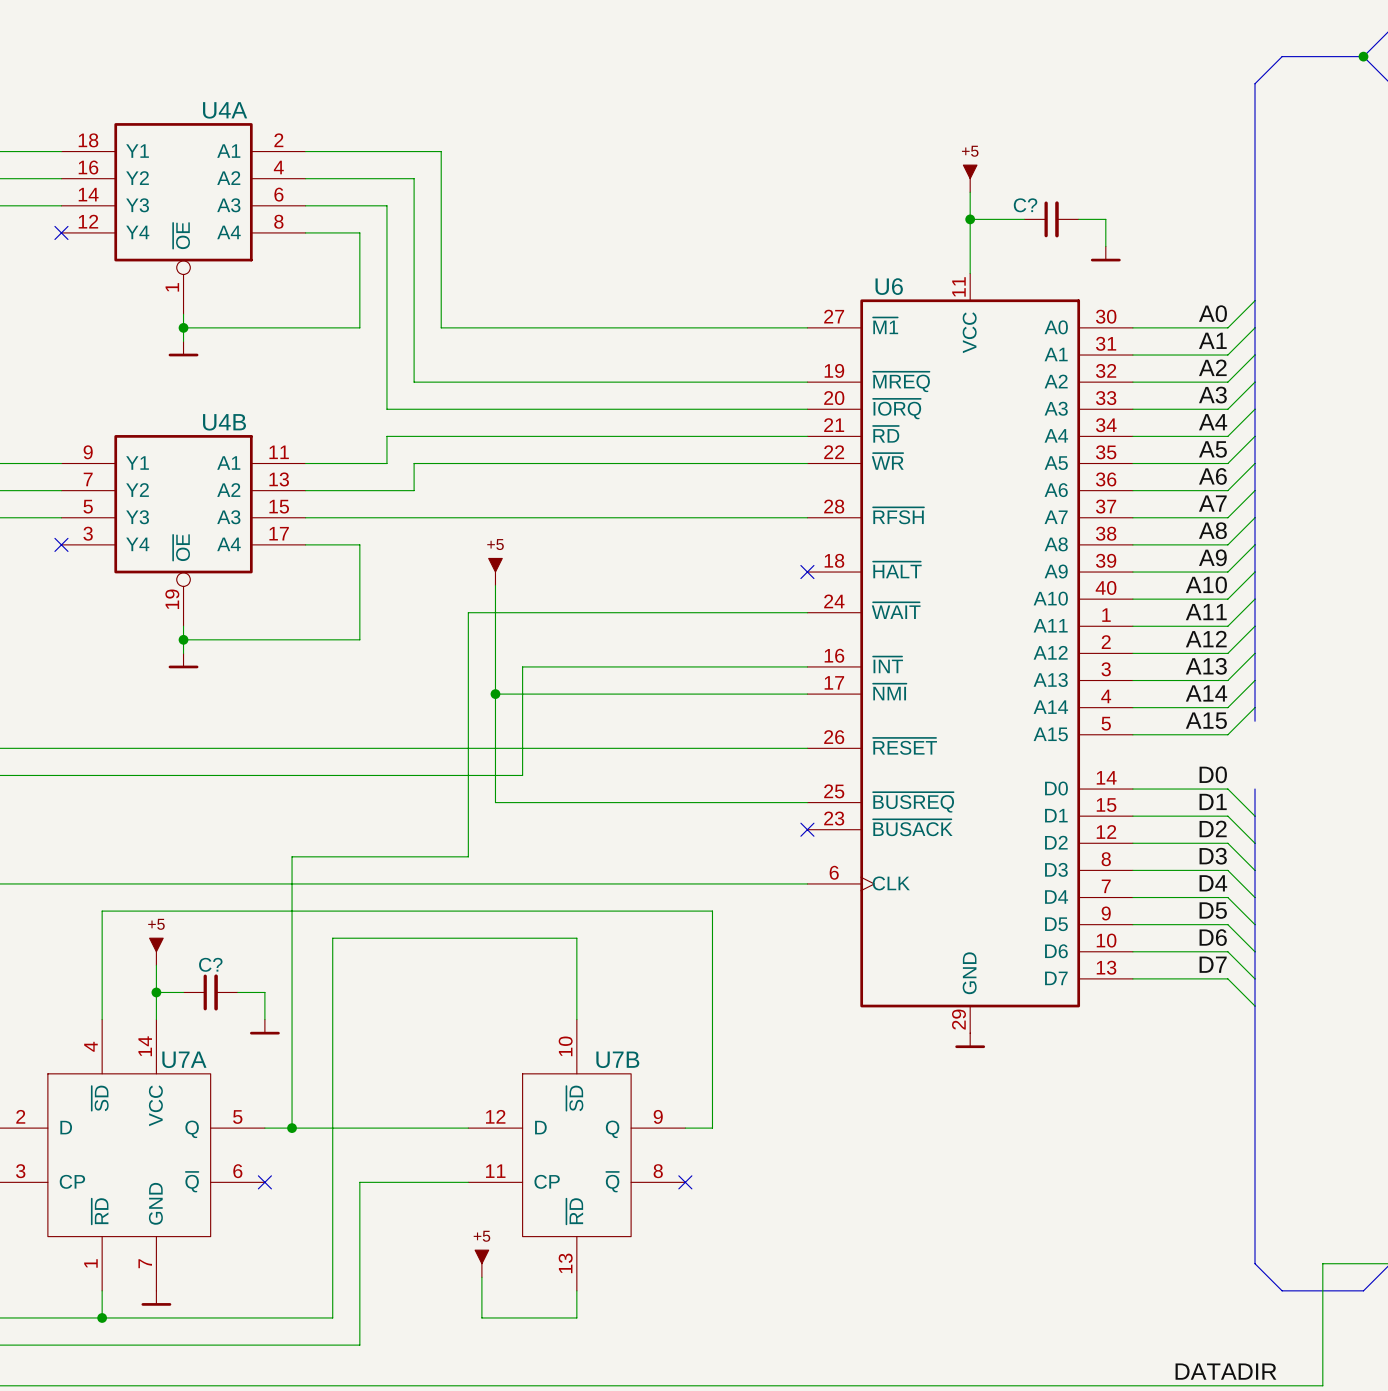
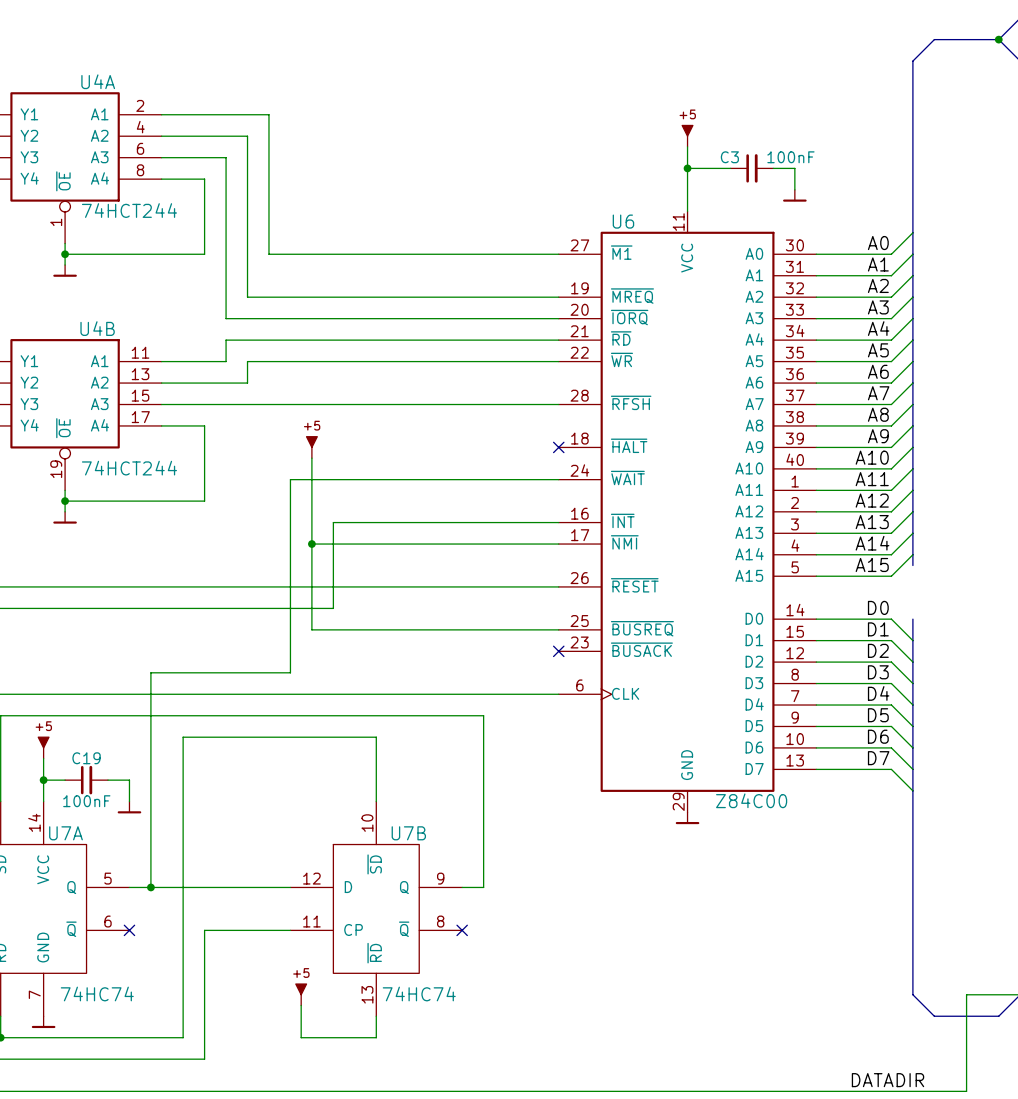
C? name: C? (1025, 205) -> C3 (729, 157)
C? value: none -> 100nF (790, 157)
U4A value: none -> 74HCT244 (129, 210)
U4B value: none -> 74HCT244 (129, 468)
C? name: C? (210, 964) -> C19 (86, 758)
U6 value: none -> Z84C00 (751, 800)
C? value: none -> 100nF (86, 801)
U7A value: none -> 74HC74 (97, 993)
U7B value: none -> 74HC74 (419, 993)

